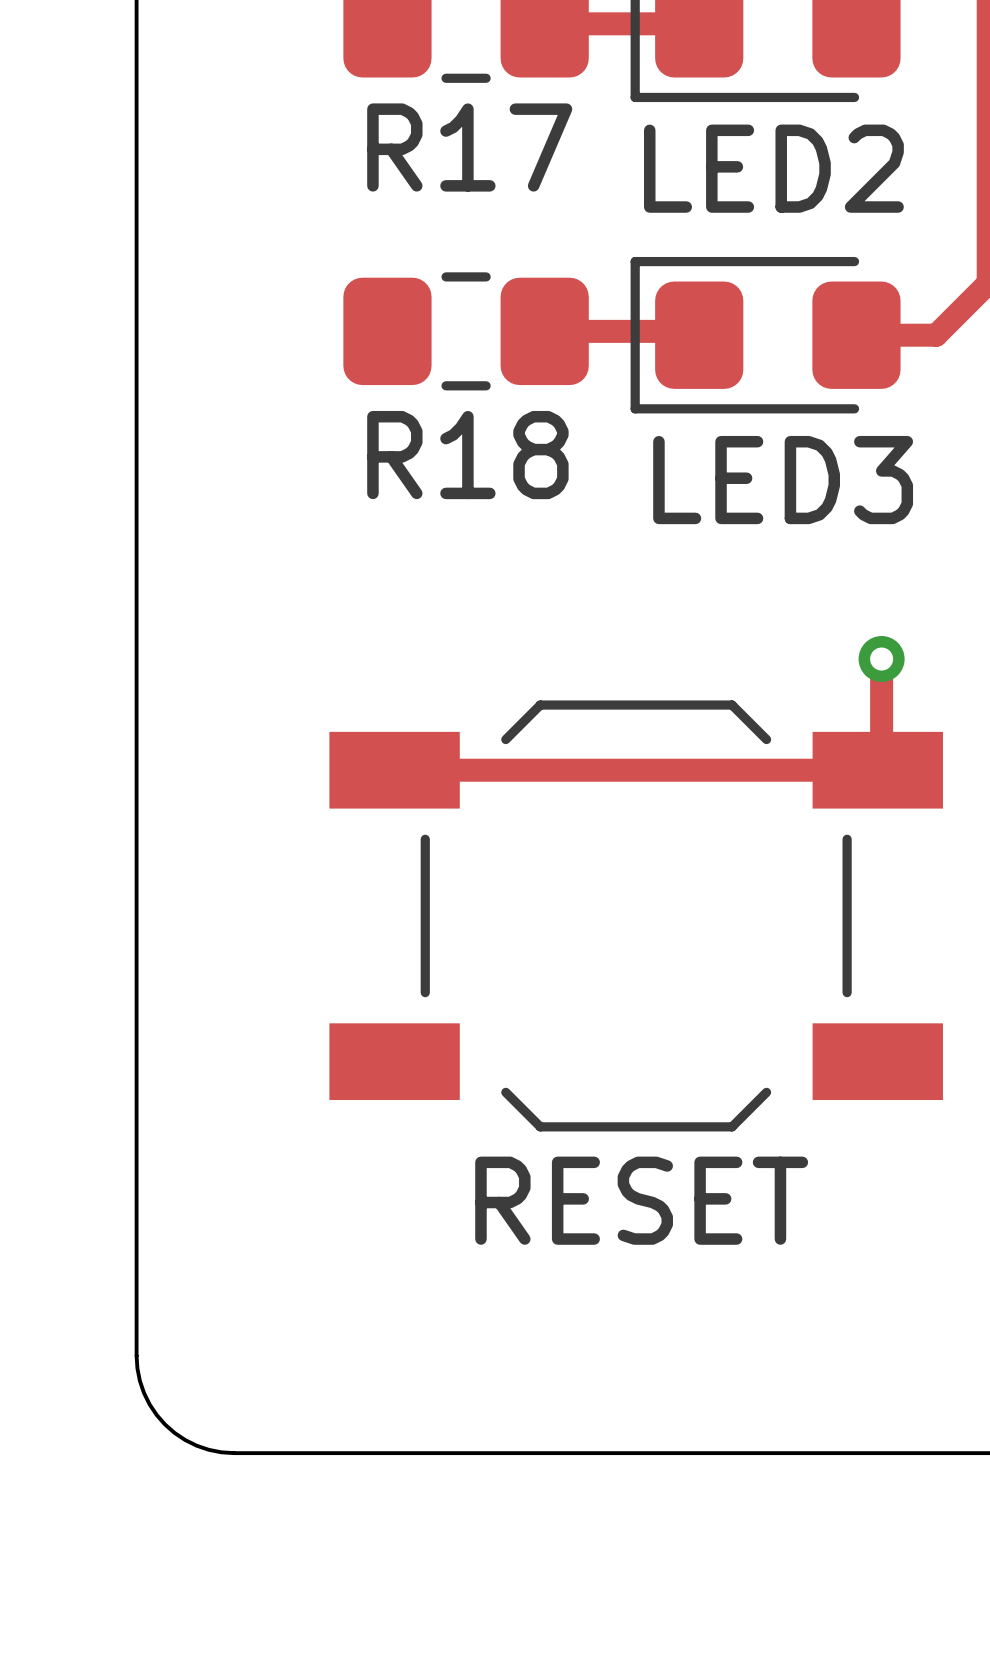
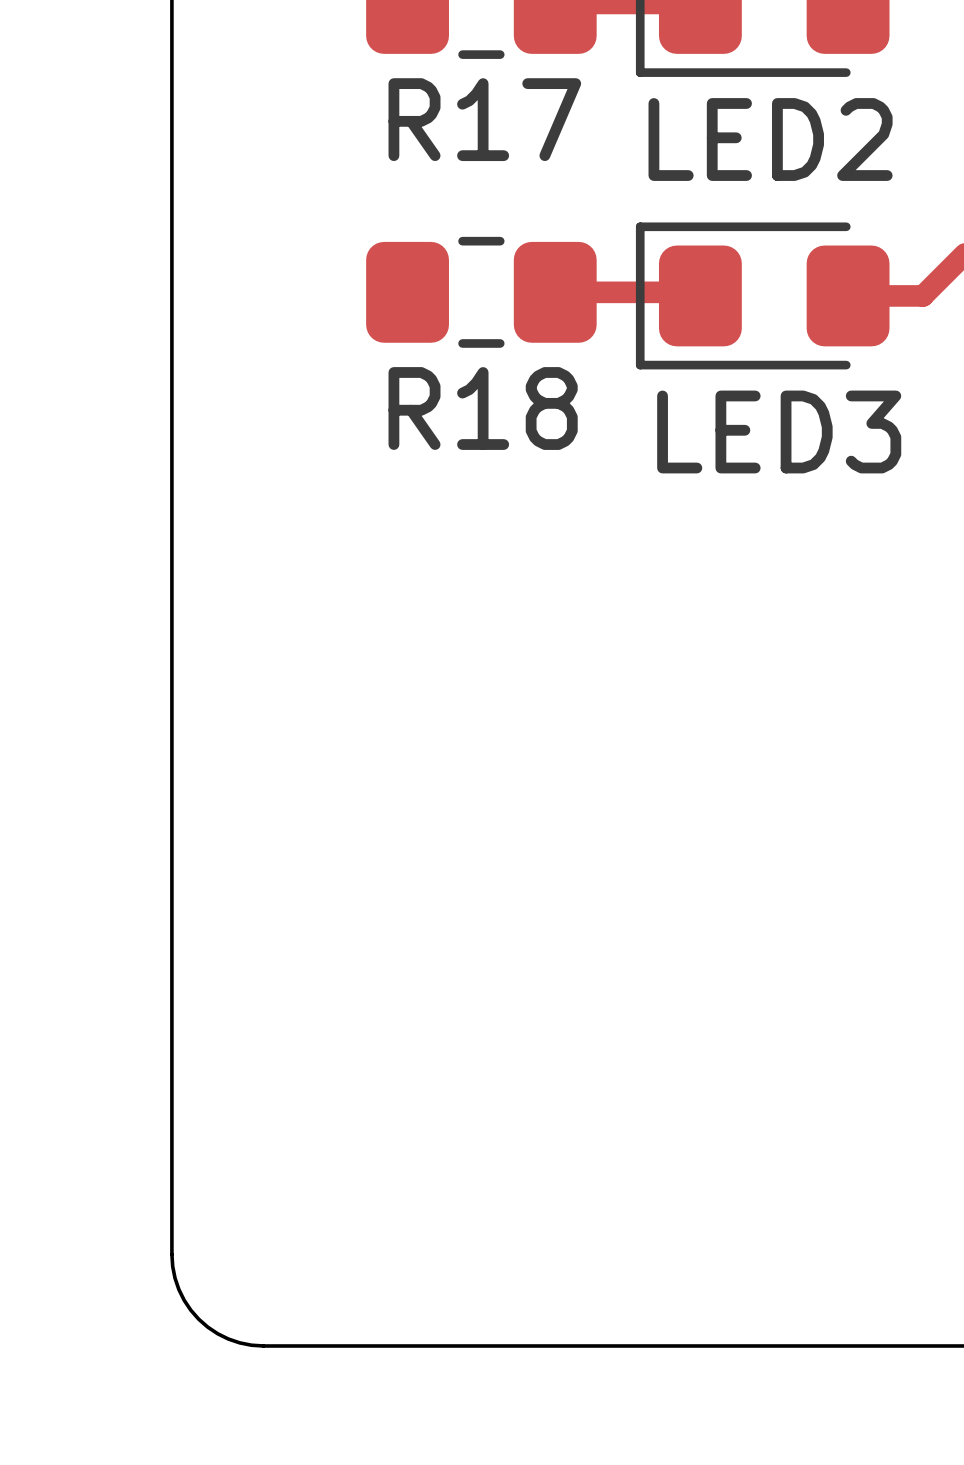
track: (881, 659) (881, 766) (877, 770) (394, 770) -> none
via: (881, 659) -> none
RESET: (636, 915) -> none

